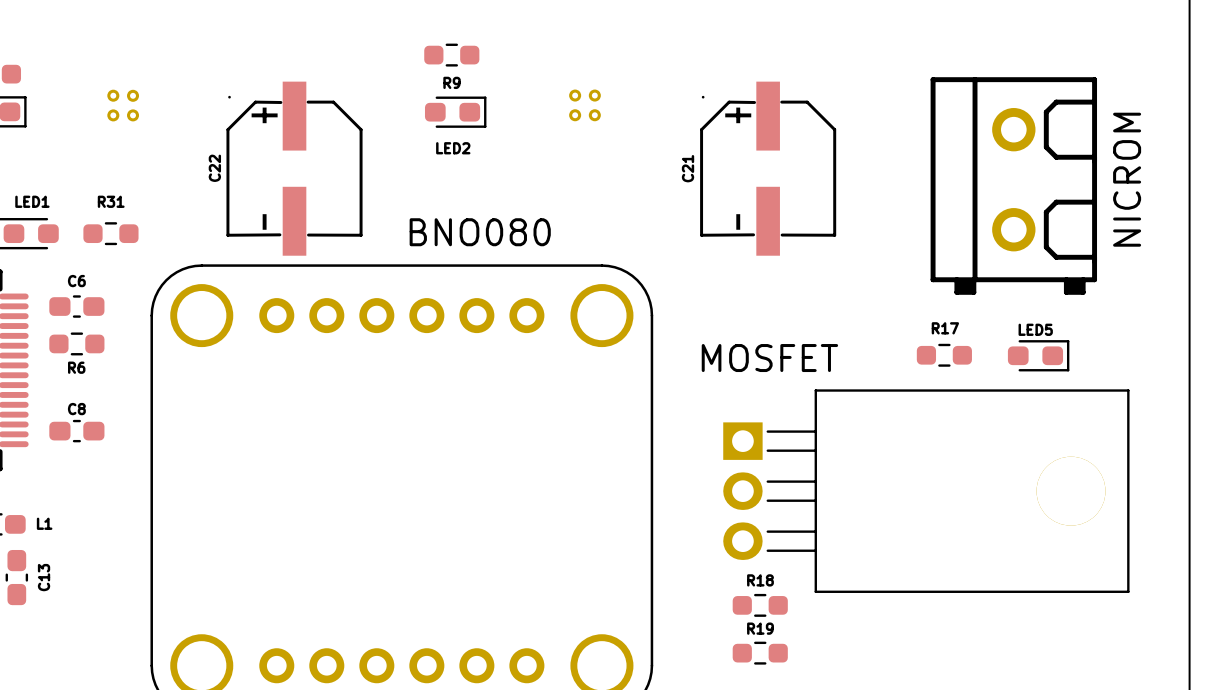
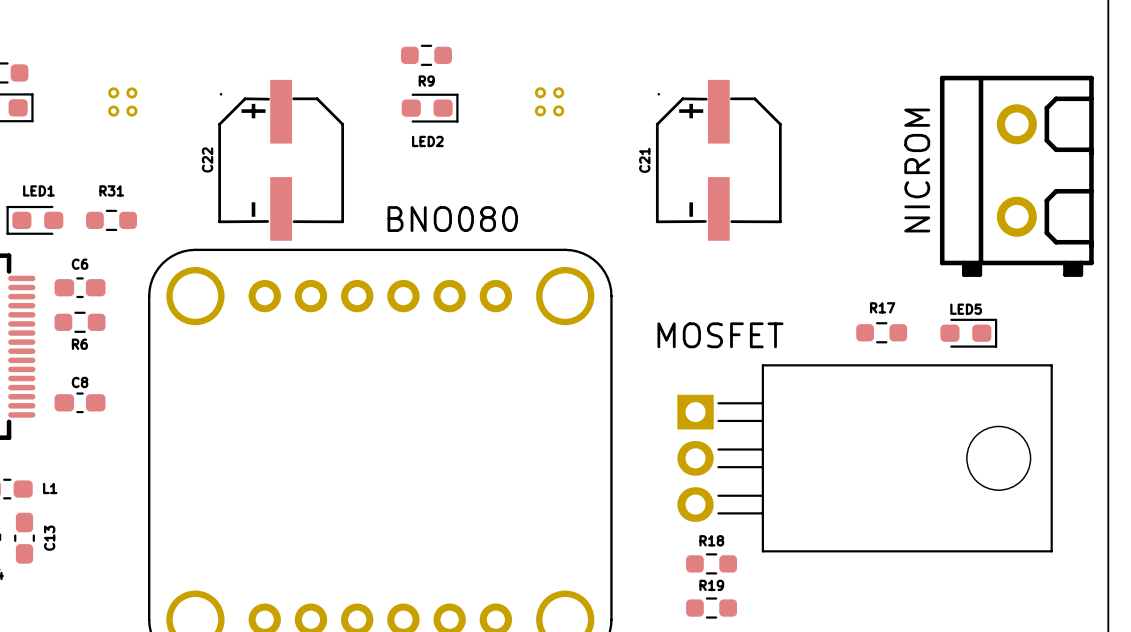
part text position: NICROM (1127, 179) -> NICROM (917, 170)
part position: (1013, 186) -> (1016, 176)
part footprint: [723, 389, 1130, 593] -> [677, 364, 1053, 553]

